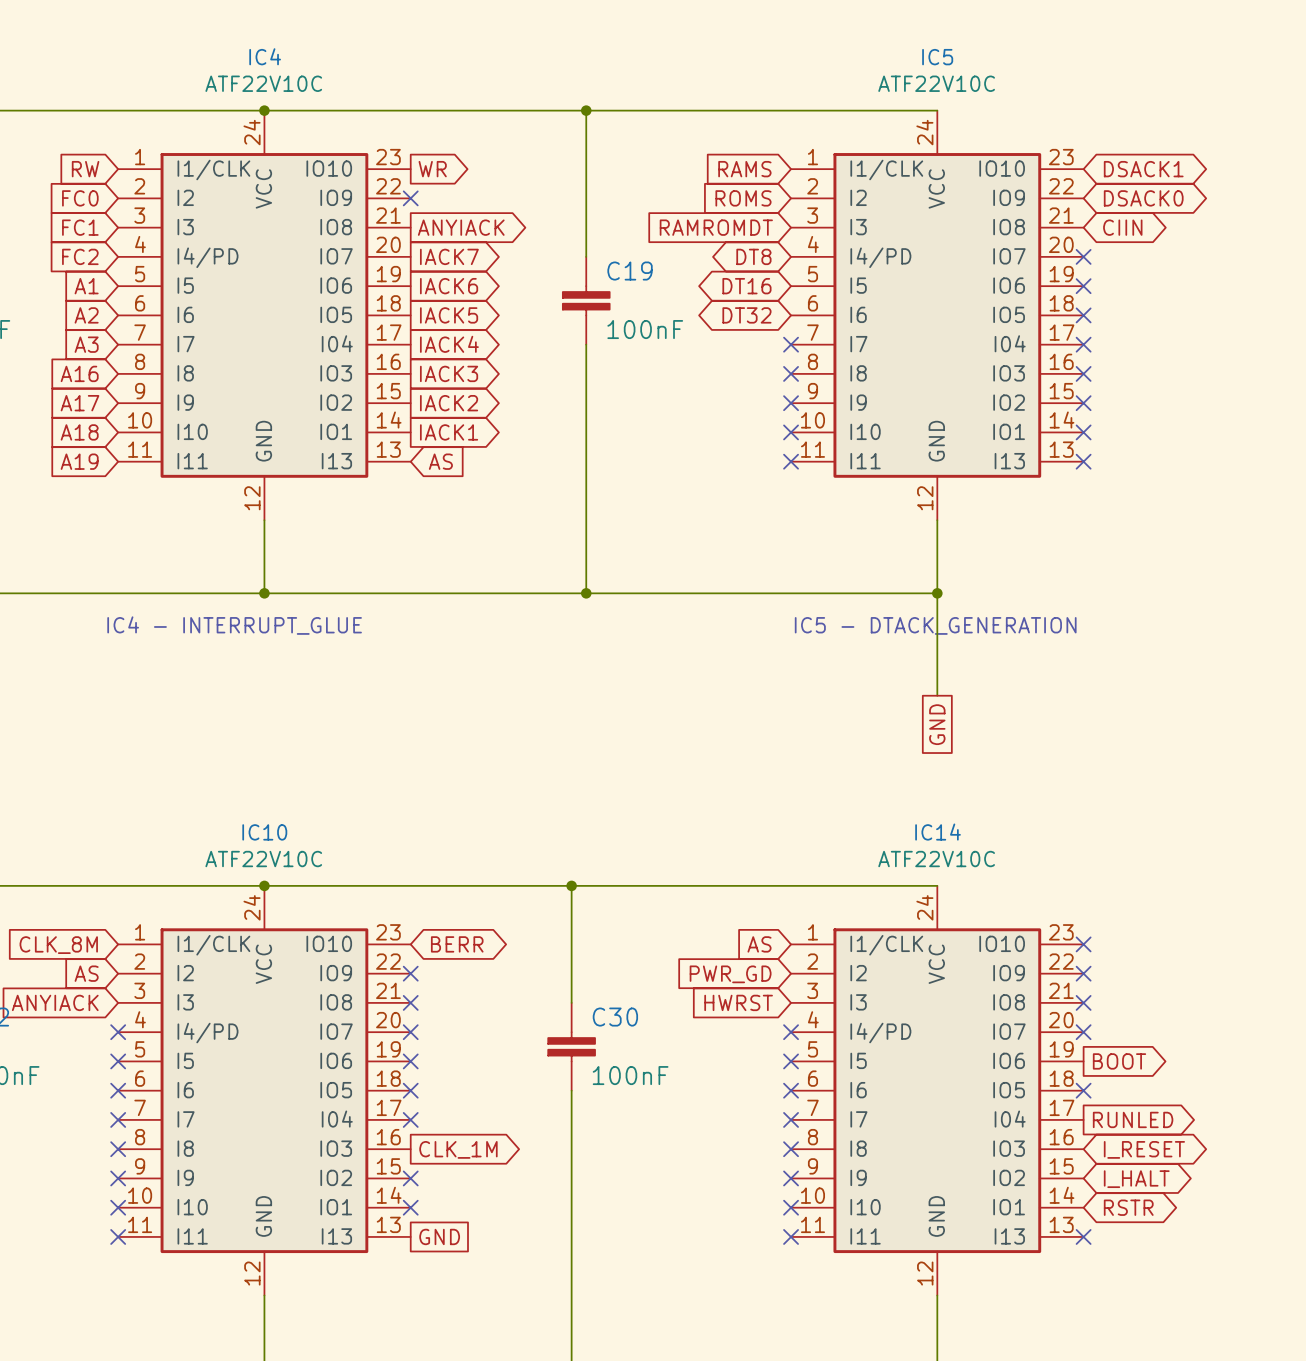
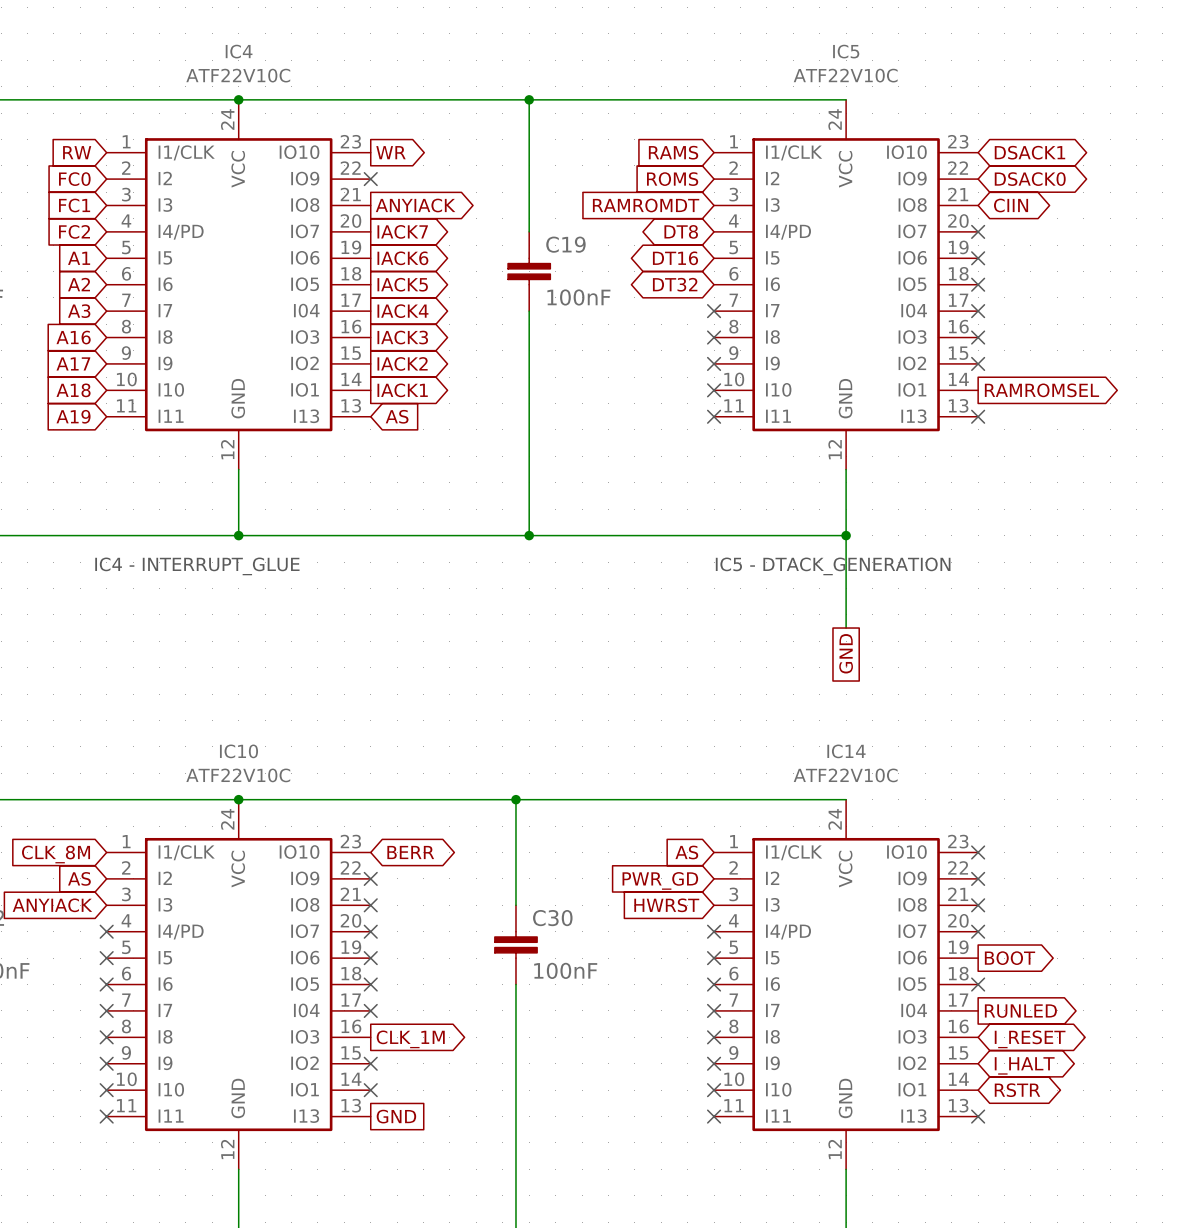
no-connect mark: (1083, 432) -> none
global label: none -> RAMROMSEL (1041, 390)

